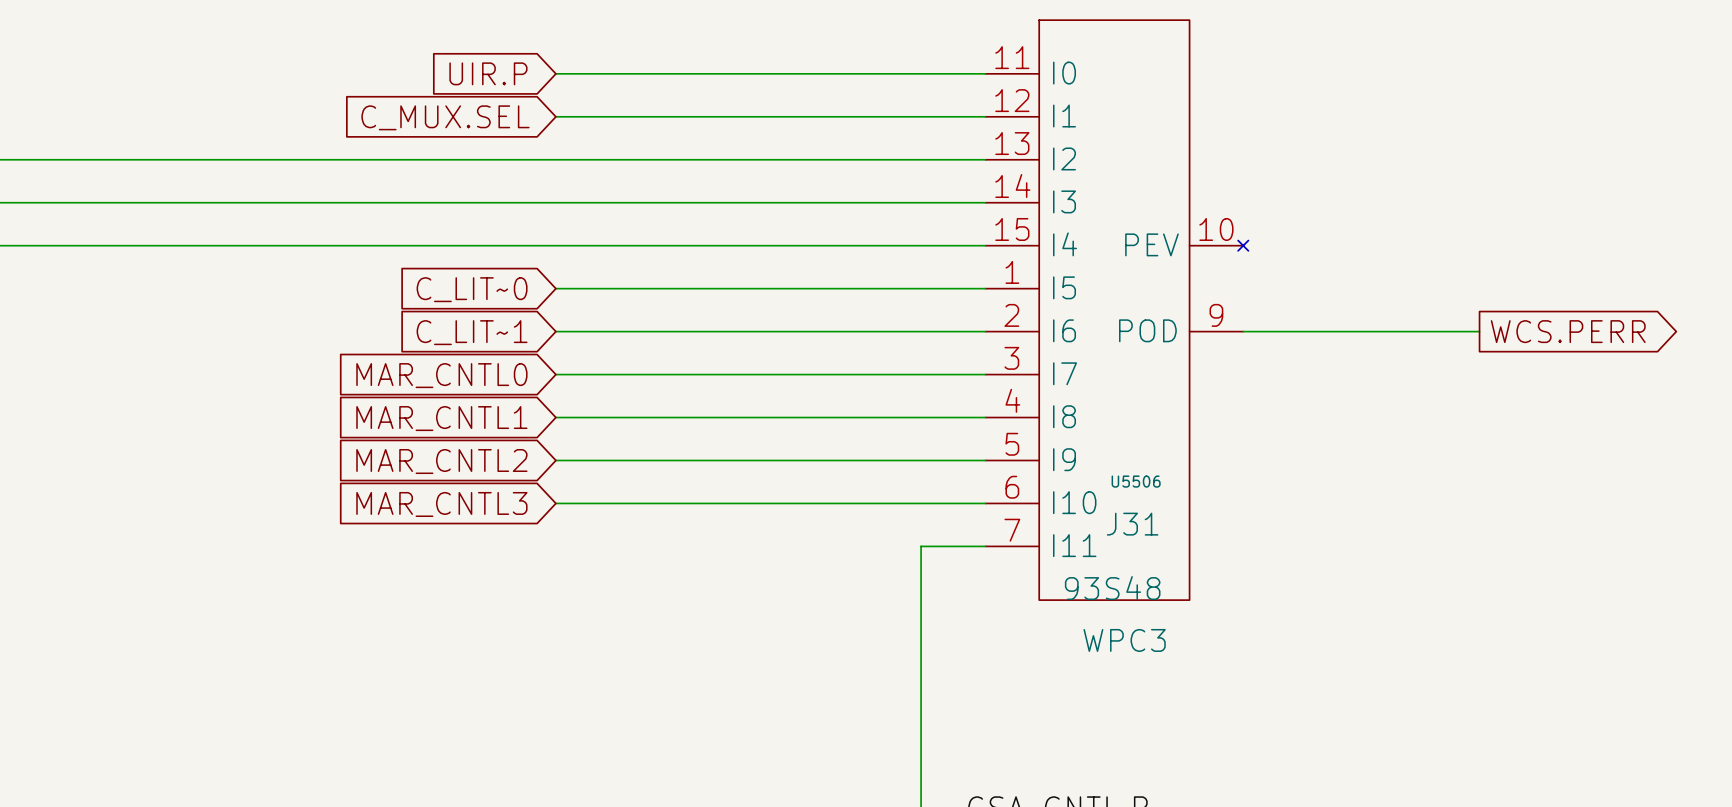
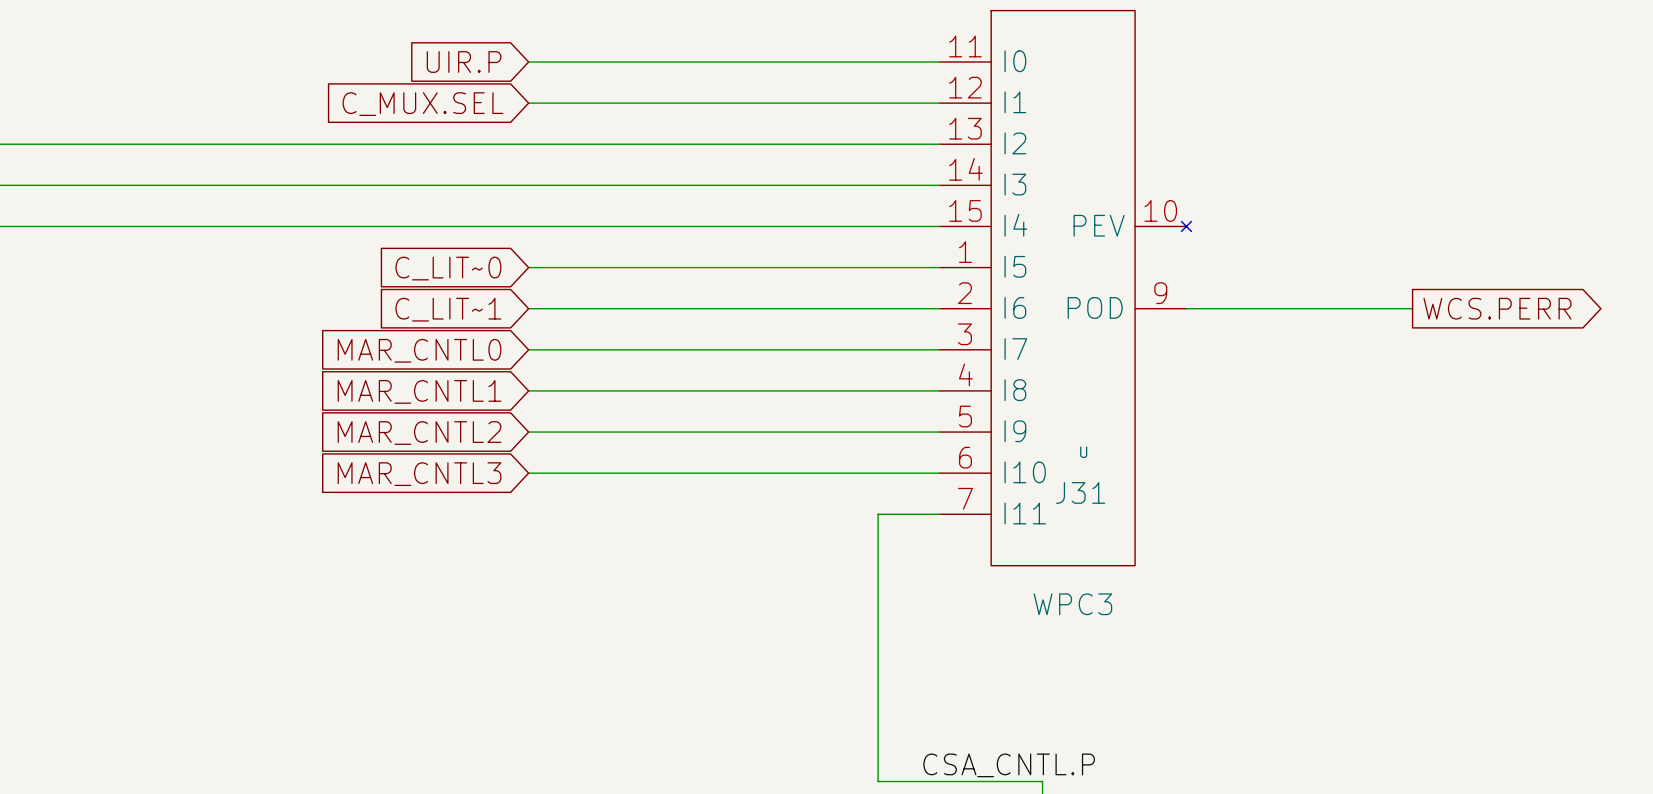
U5506 name: U5506 (1136, 481) -> U (1083, 452)
U5506 value: 93S48 (1112, 588) -> none

